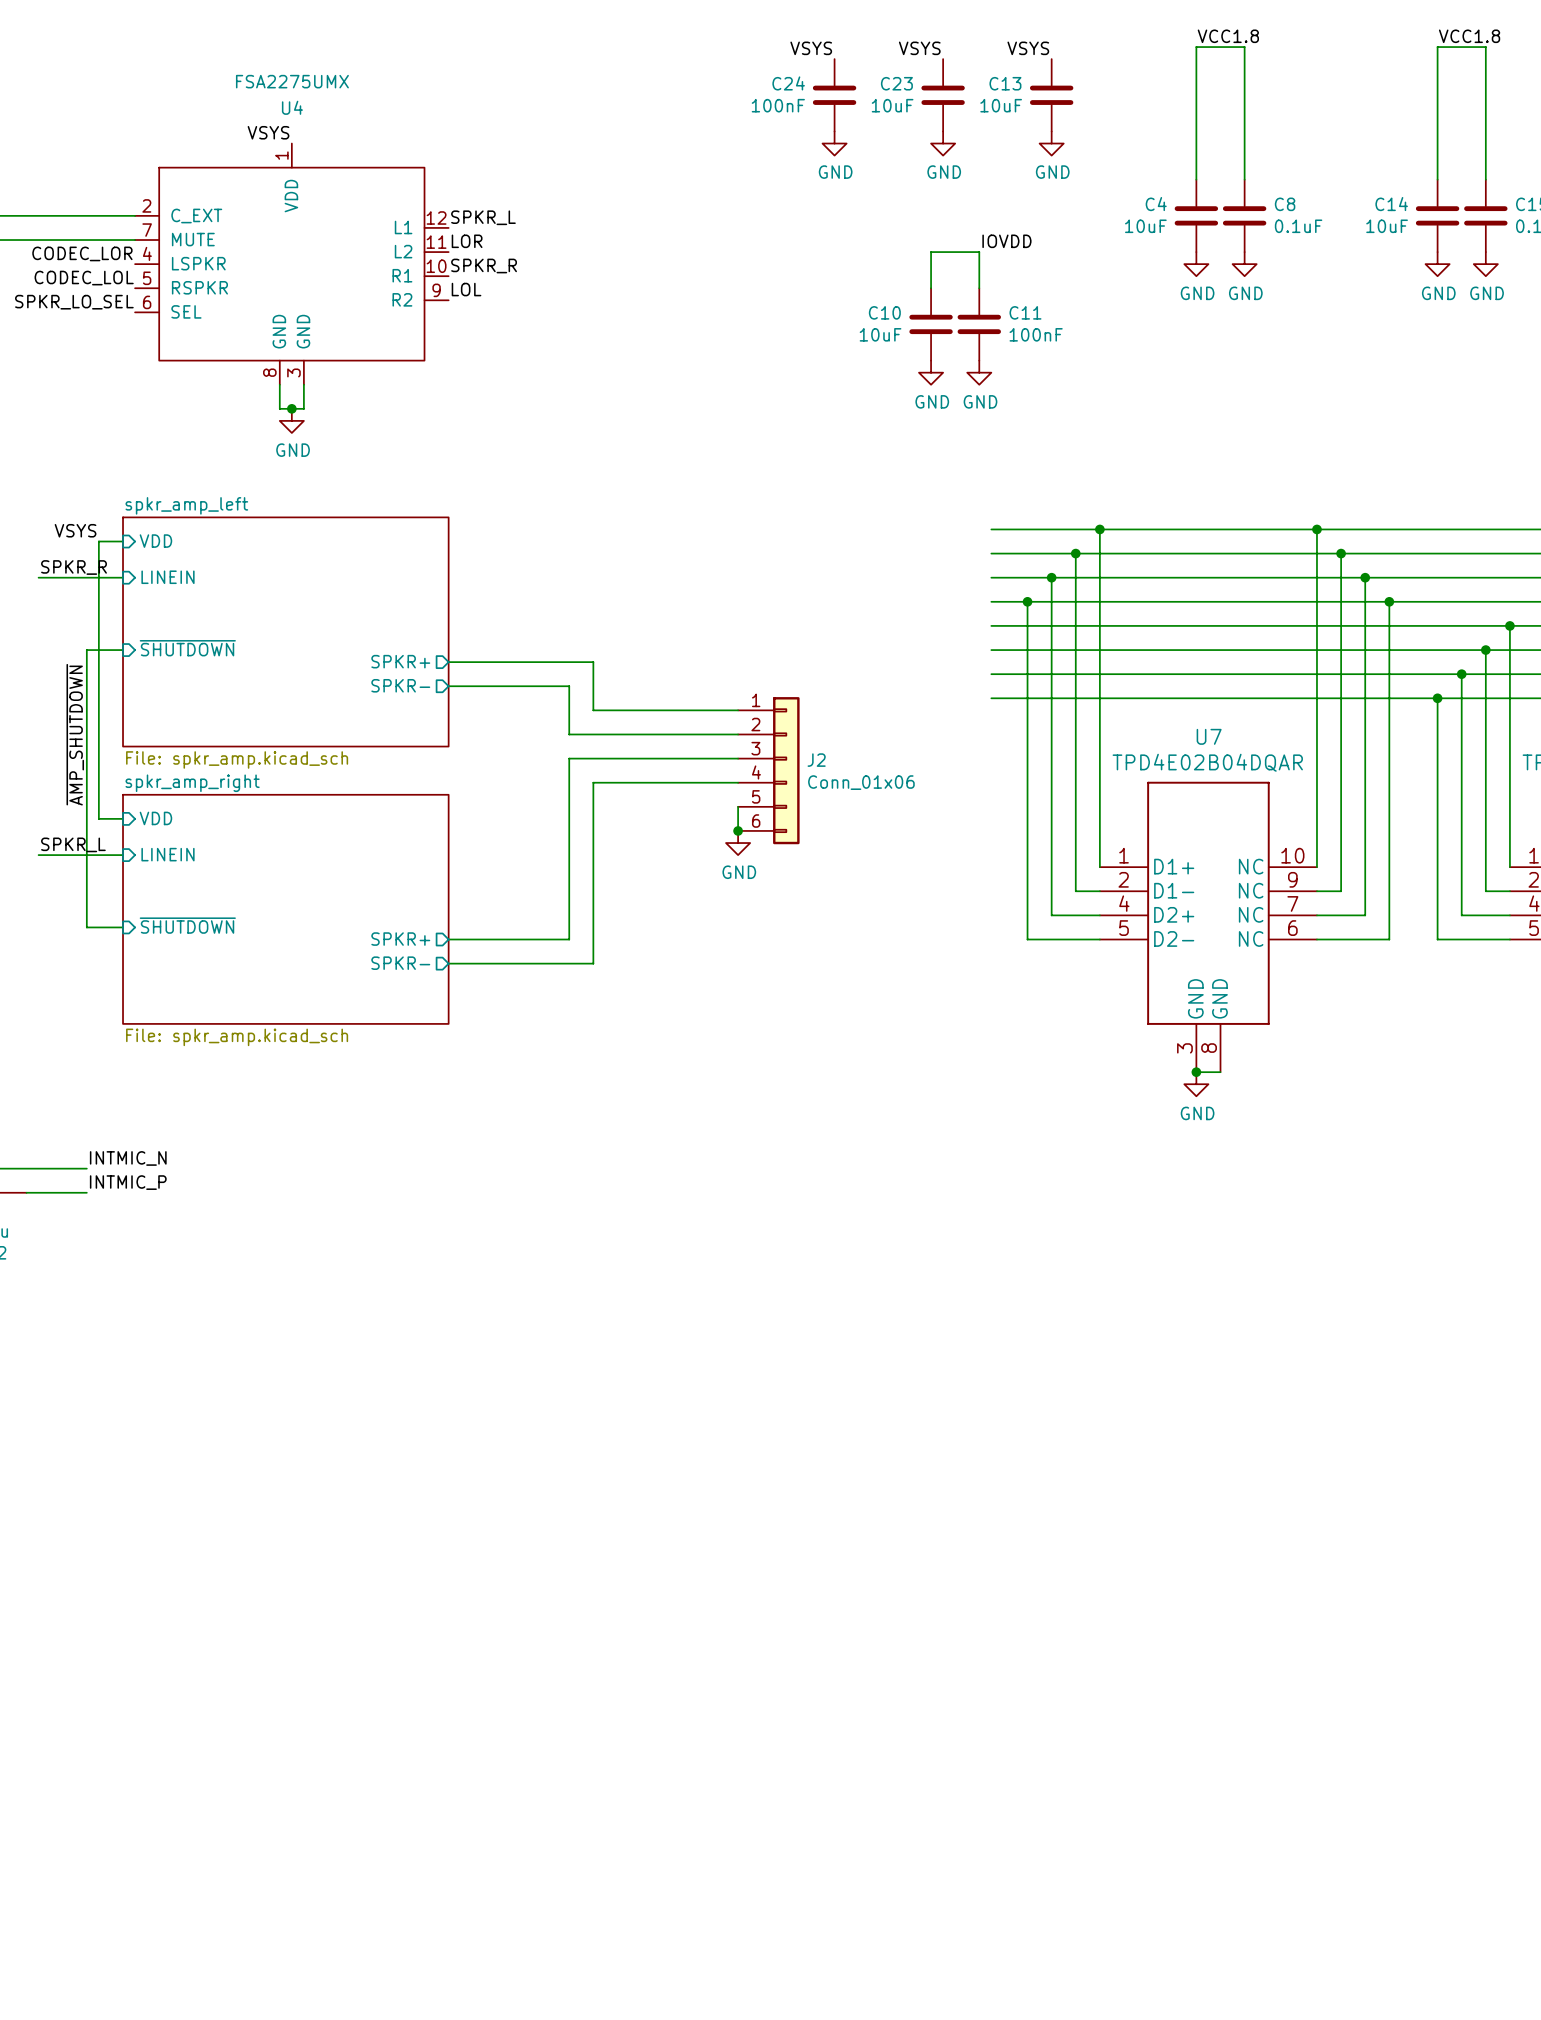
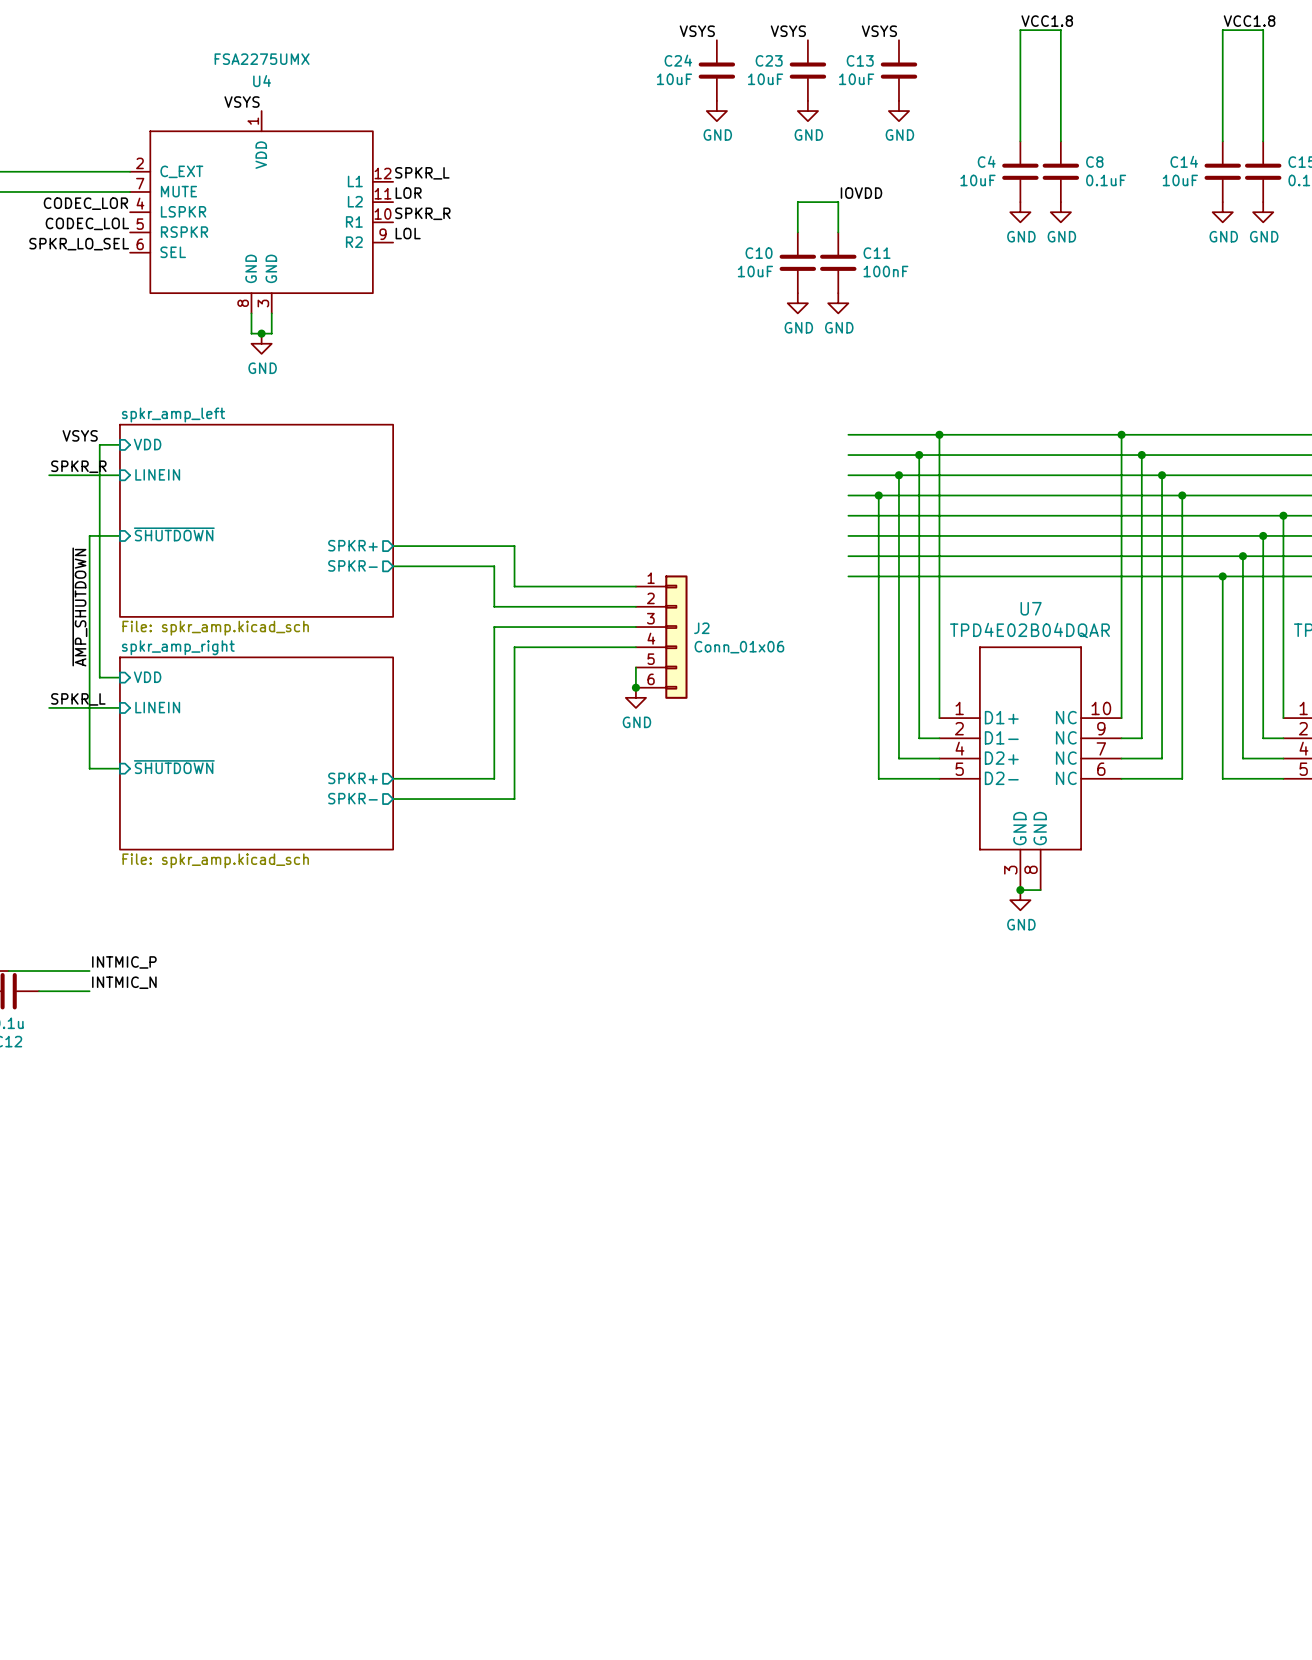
C24 value: 100nF (778, 105) -> 10uF (674, 79)
label: INTMIC_N (128, 1158) -> INTMIC_P (124, 962)
label: INTMIC_P (128, 1182) -> INTMIC_N (124, 982)

